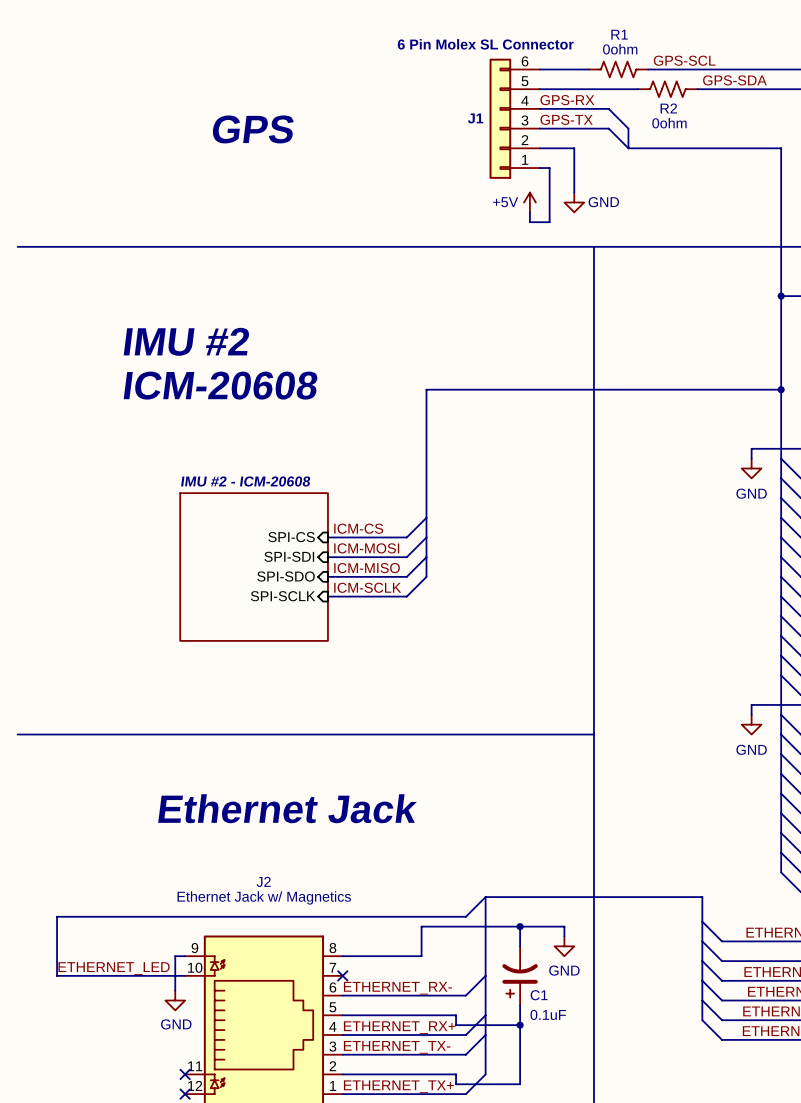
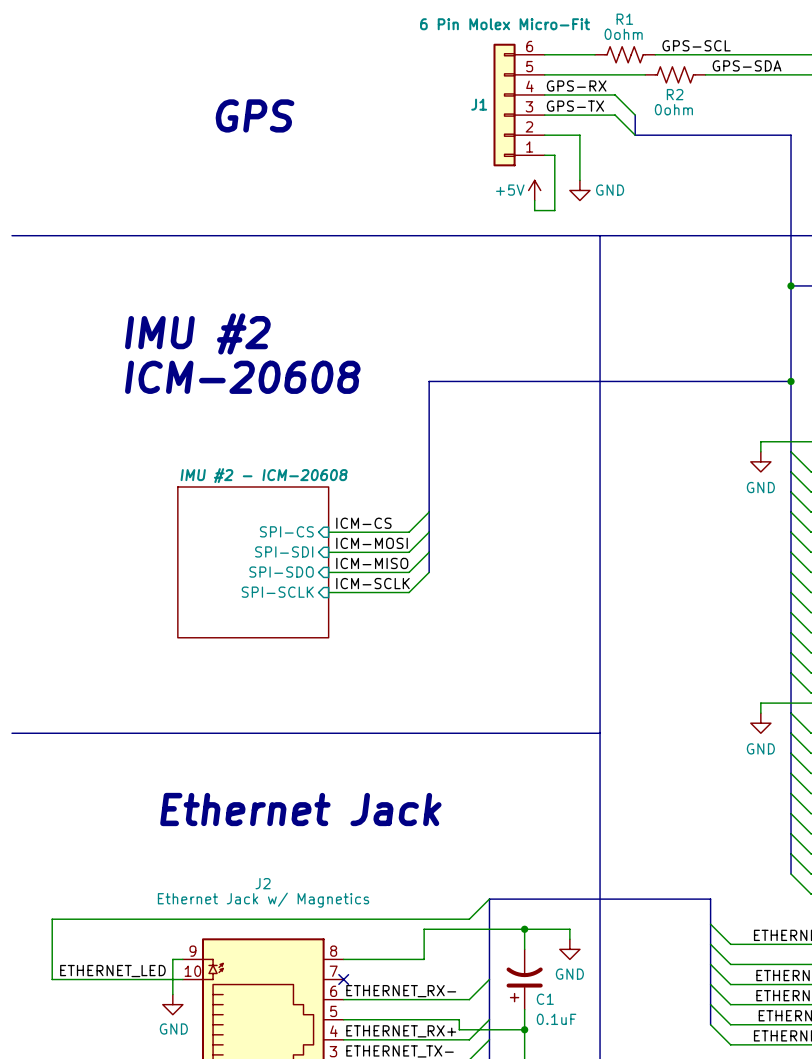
J1 value: 6 Pin Molex SL Connector (485, 44) -> 6 Pin Molex Micro-Fit (505, 24)

